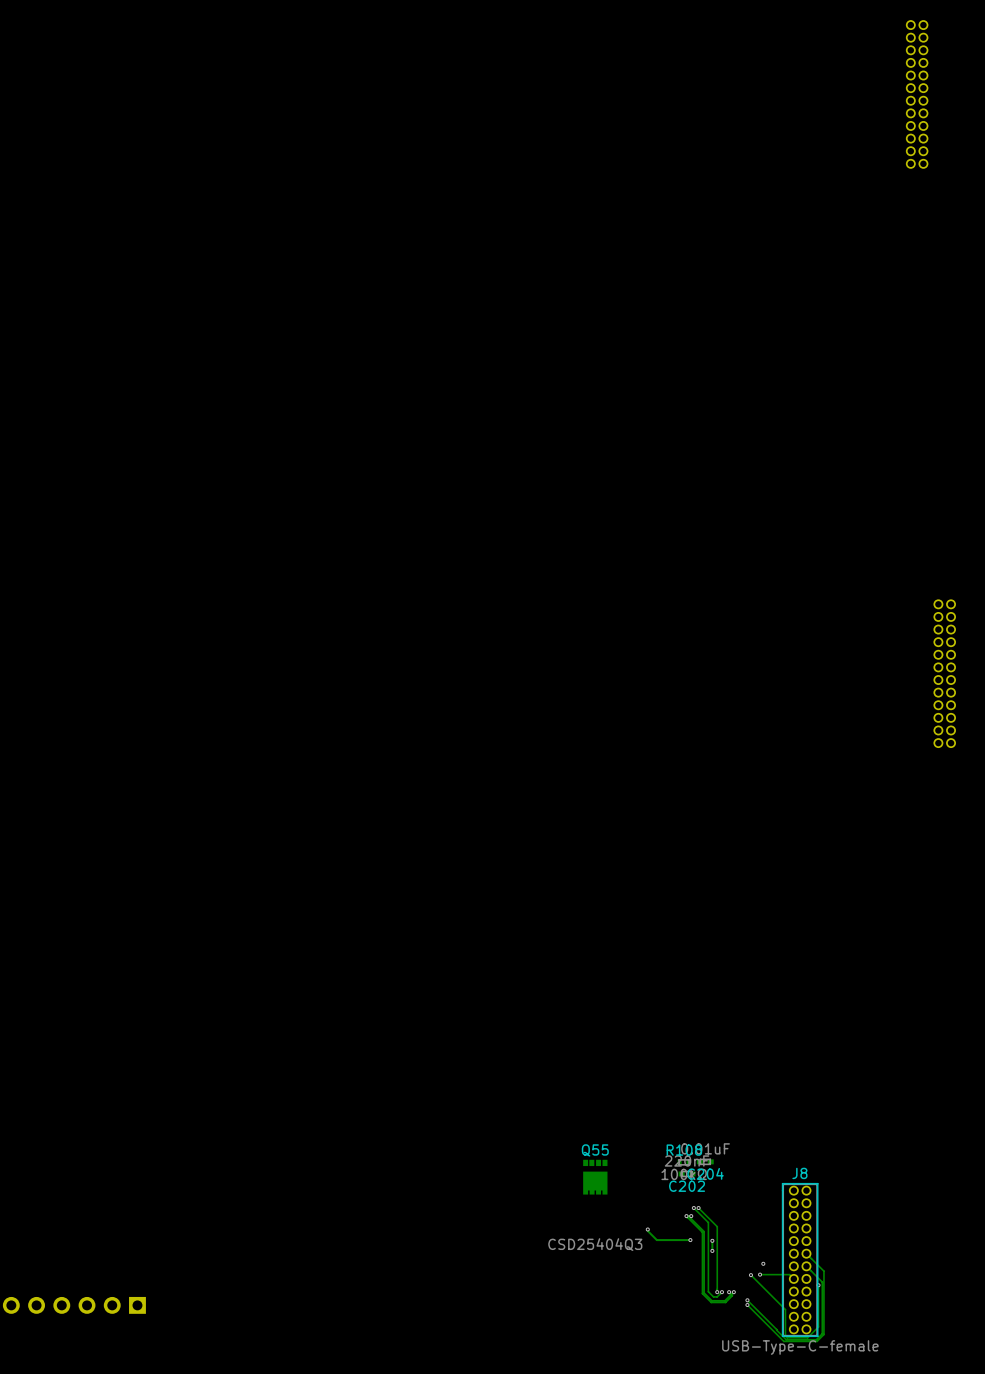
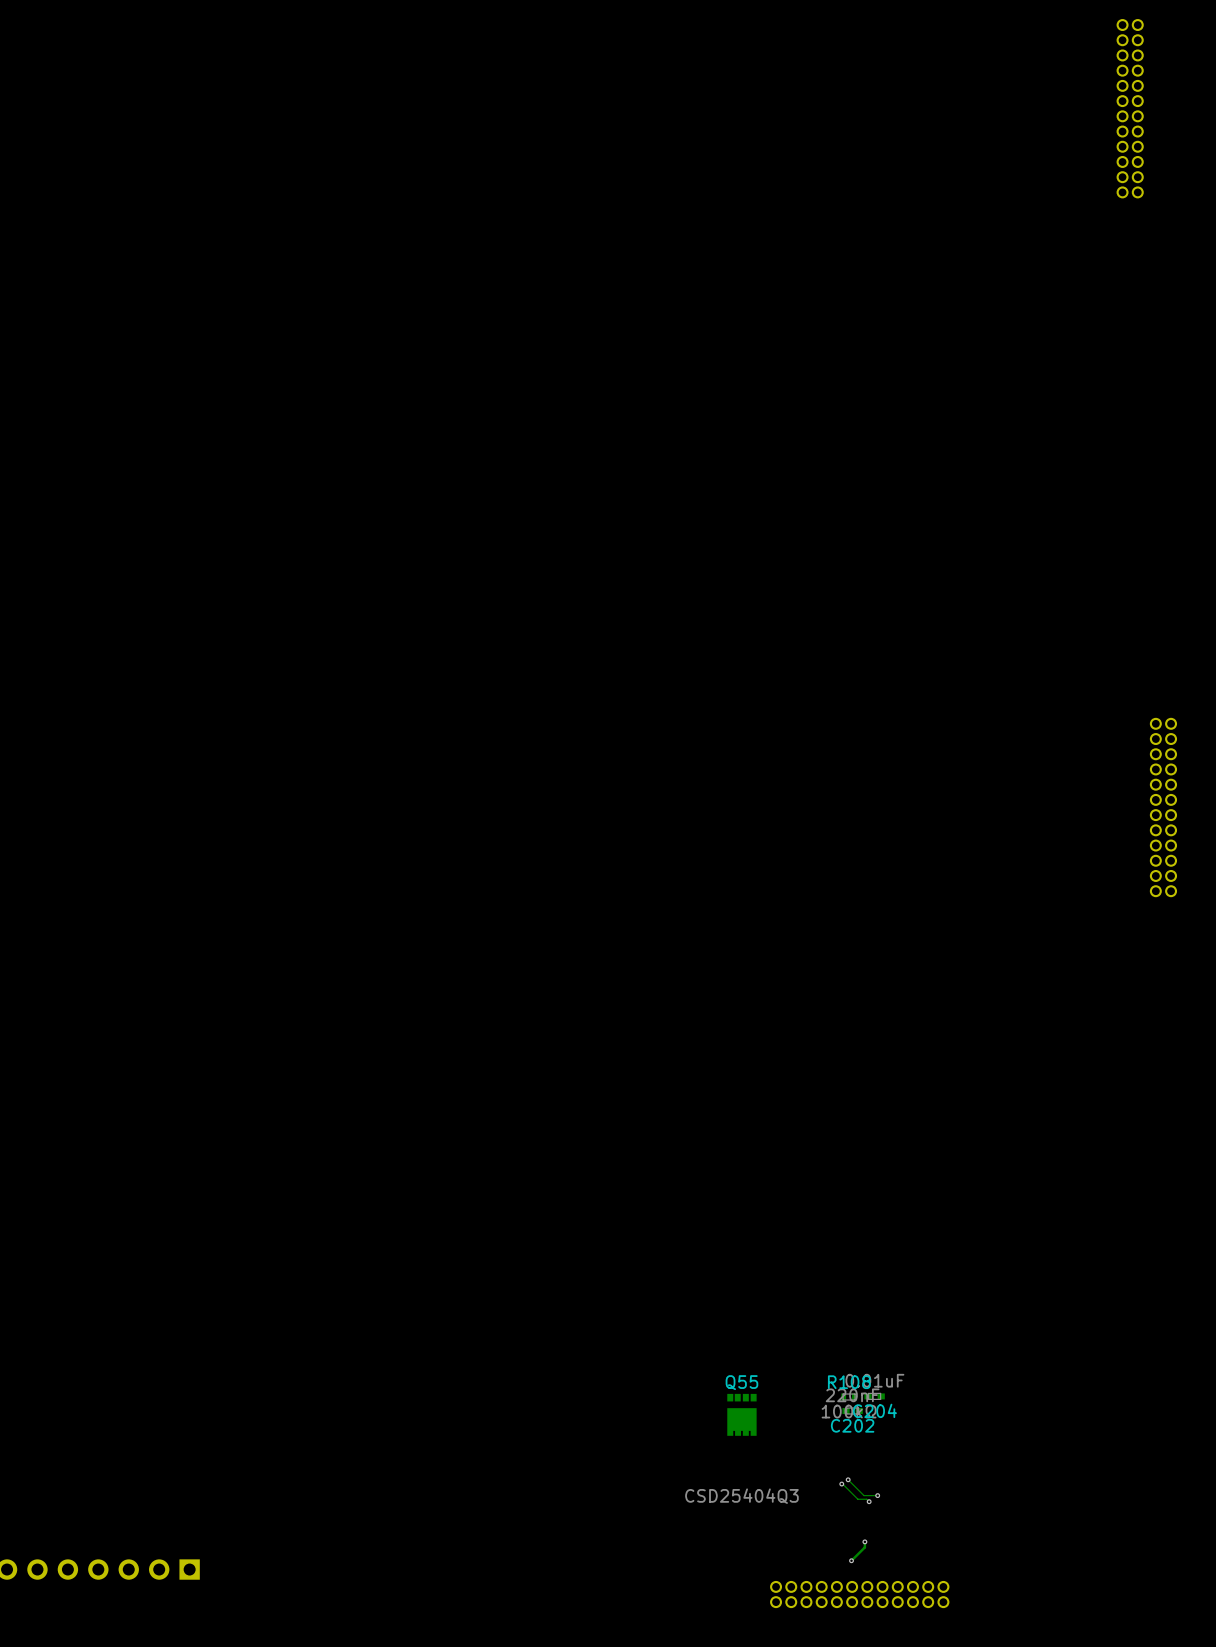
track: (693, 1208) (708, 1222) (708, 1291) (713, 1296) (717, 1296) (721, 1292) -> none
via: (693, 1208) -> none
track: (698, 1208) (717, 1226) (717, 1292) -> none
via: (698, 1208) -> none
track: (686, 1216) (702, 1232) (702, 1293) (711, 1302) (725, 1302) (733, 1292) -> none
via: (686, 1216) -> none
track: (691, 1216) (689, 1217) (704, 1231) (704, 1292) (711, 1300) (724, 1300) (730, 1295) (729, 1292) -> none
via: (691, 1216) -> none
track: (647, 1229) (656, 1240) (690, 1240) -> none
via: (647, 1229) -> none
track: none -> (848, 1479) (863, 1495) (877, 1495)
via: none -> (848, 1479)
track: none -> (841, 1484) (857, 1499) (866, 1499) (869, 1501)
via: none -> (841, 1484)
via: (690, 1240) -> none
track: (712, 1240) (712, 1250) -> none
via: (712, 1240) -> none
via: none -> (877, 1495)
via: none -> (869, 1501)
via: (712, 1250) -> none
track: (806, 1253) (823, 1271) (823, 1334) (817, 1341) (783, 1341) (747, 1305) -> none
J8 side: bottom (800, 1260) -> top (859, 1594)
via: (763, 1263) -> none
track: (806, 1266) (822, 1282) (822, 1333) (816, 1339) (786, 1339) (747, 1300) -> none
track: (760, 1274) (789, 1274) (793, 1278) -> none
via: (760, 1274) -> none
track: (750, 1275) (785, 1309) (785, 1335) (787, 1337) (807, 1337) (818, 1326) (818, 1285) -> none
via: (750, 1275) -> none
track: none -> (864, 1541) (864, 1547) (851, 1560)
via: none -> (864, 1541)
via: (818, 1285) -> none
via: (717, 1292) -> none
via: (721, 1292) -> none
via: (729, 1292) -> none
via: (733, 1292) -> none
via: none -> (851, 1560)
via: (747, 1300) -> none
via: (747, 1305) -> none

